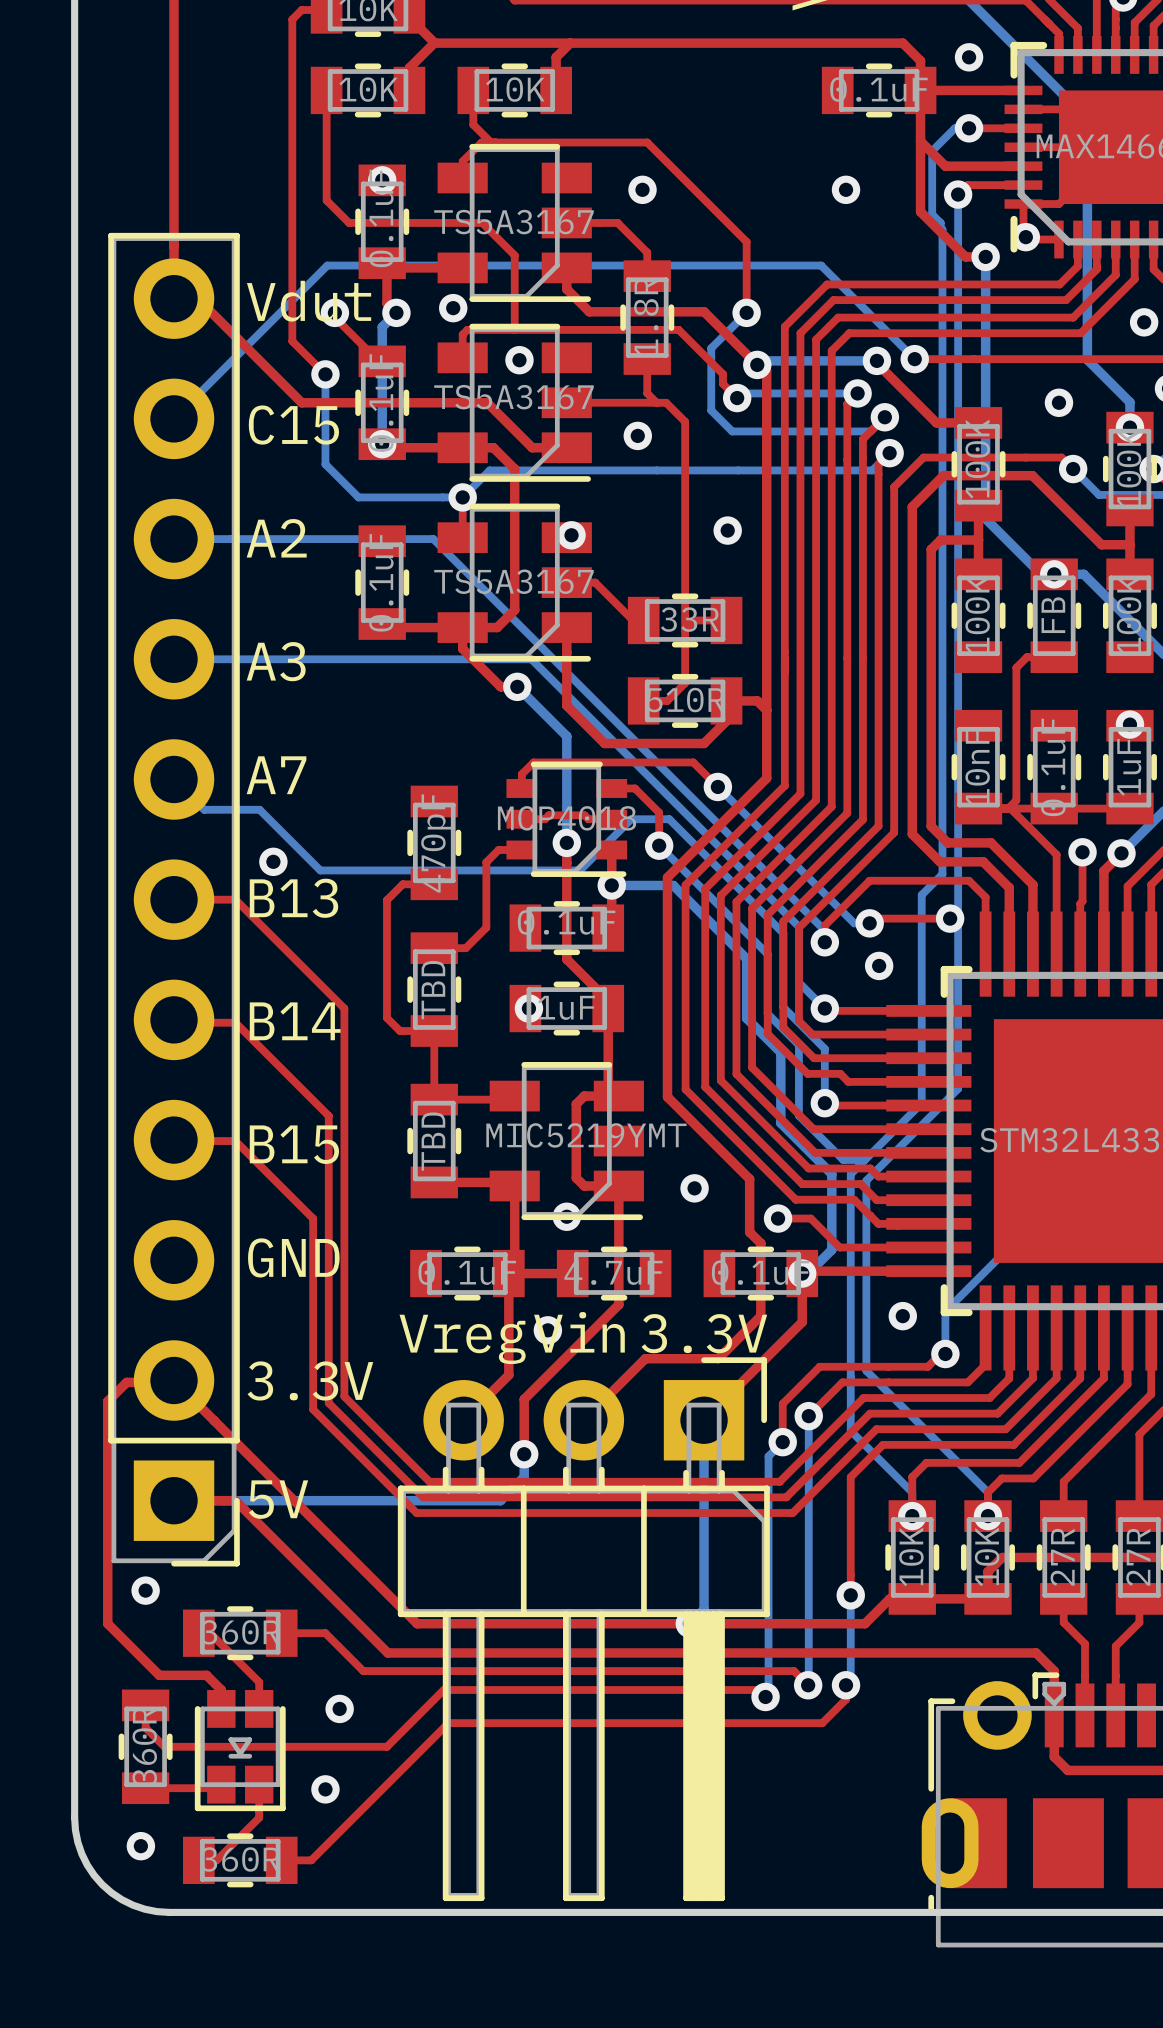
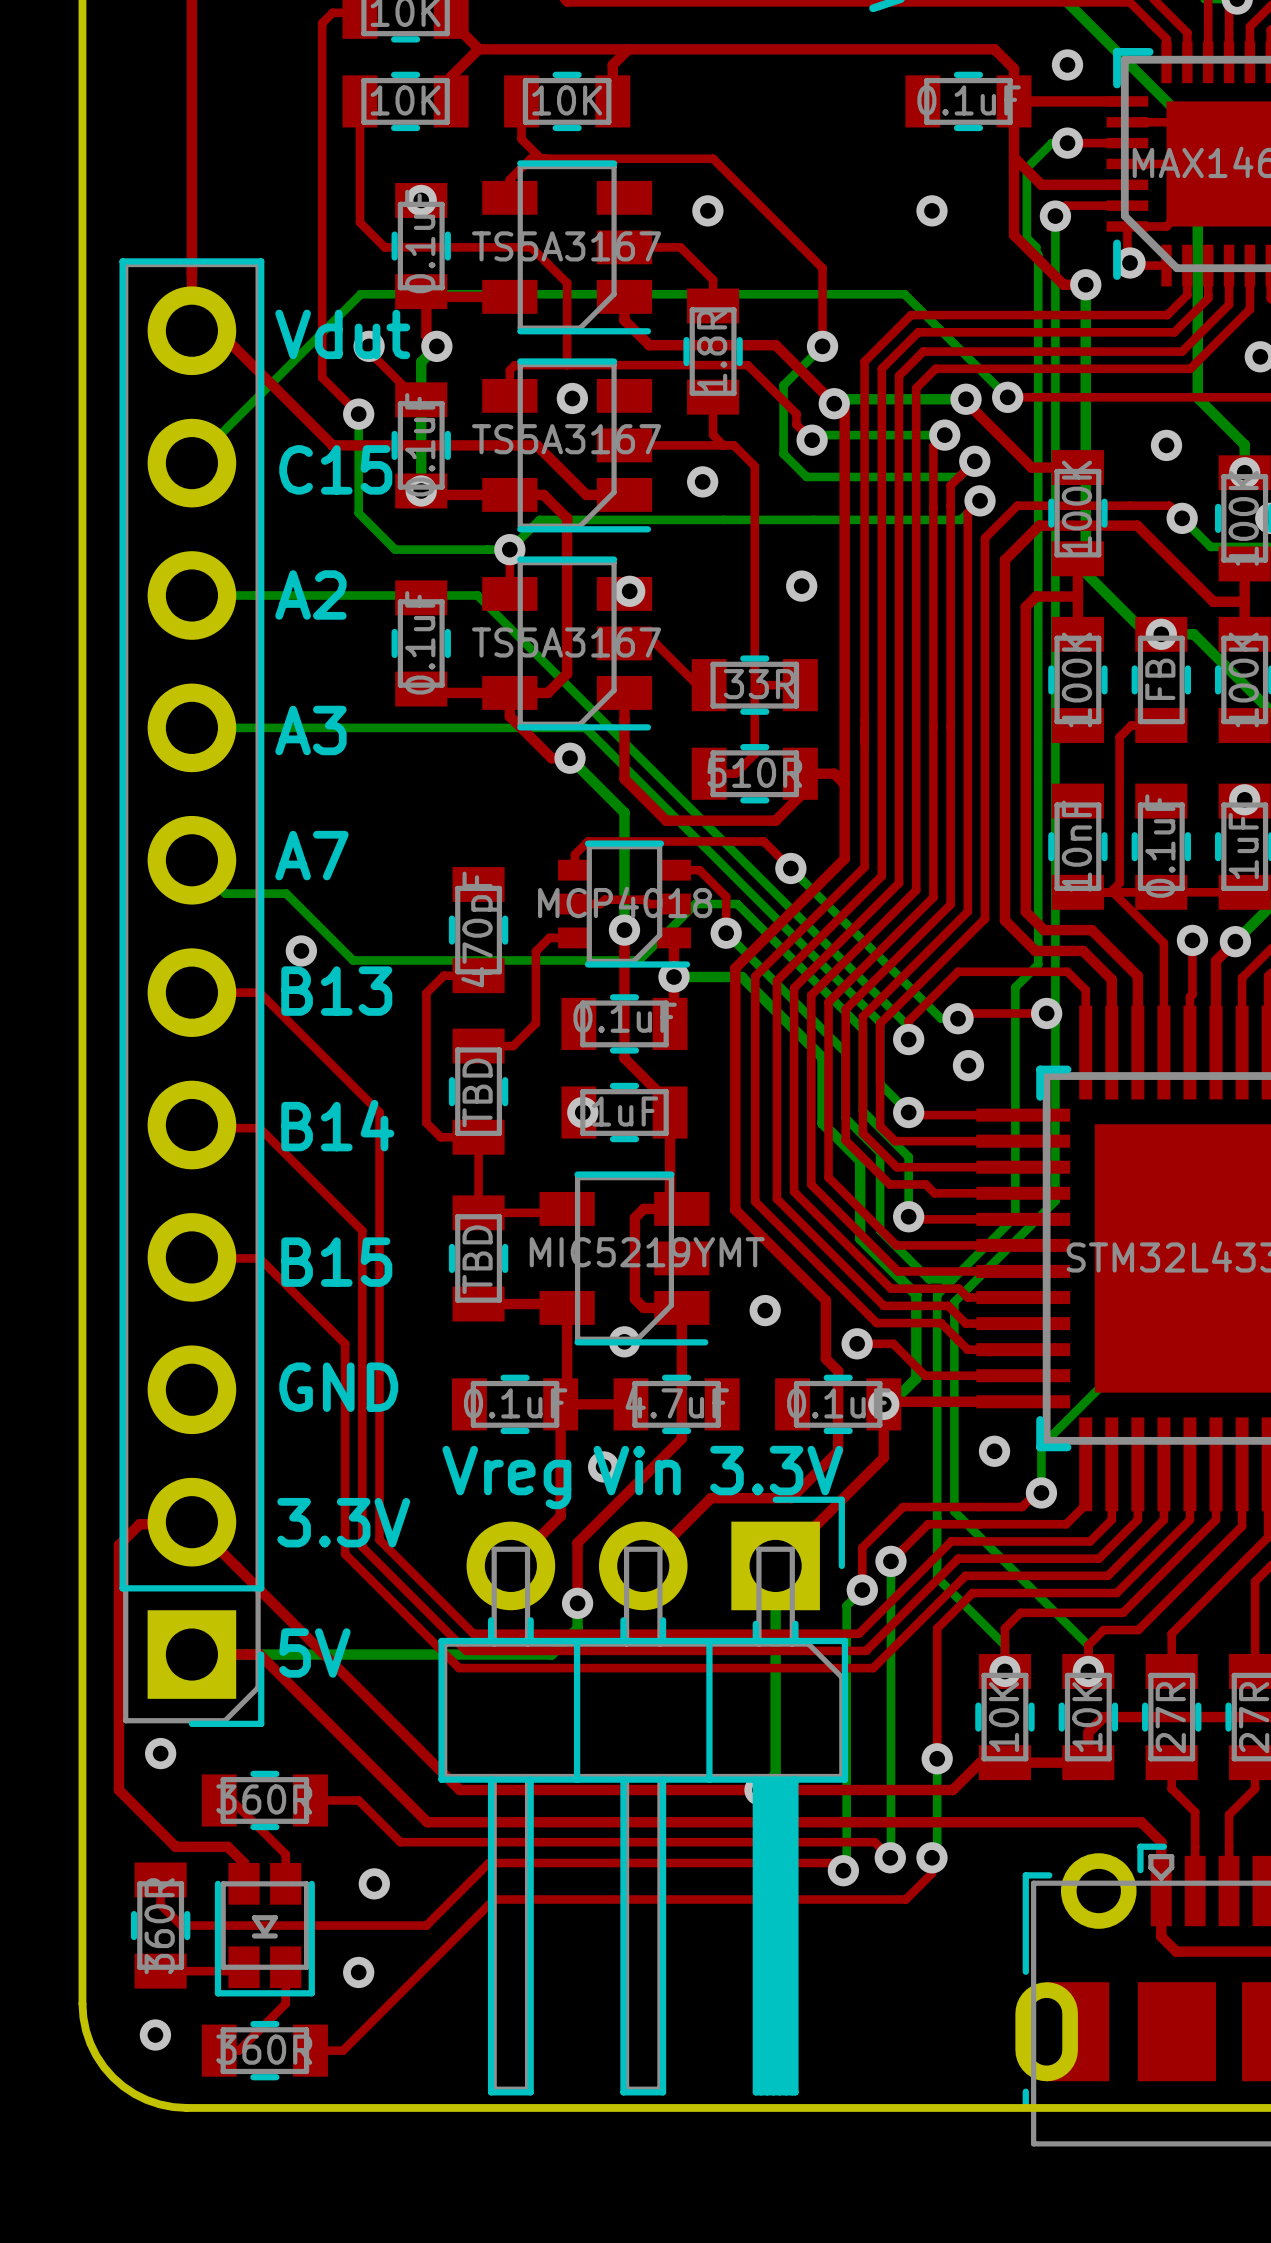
via: (453, 308) -> none

